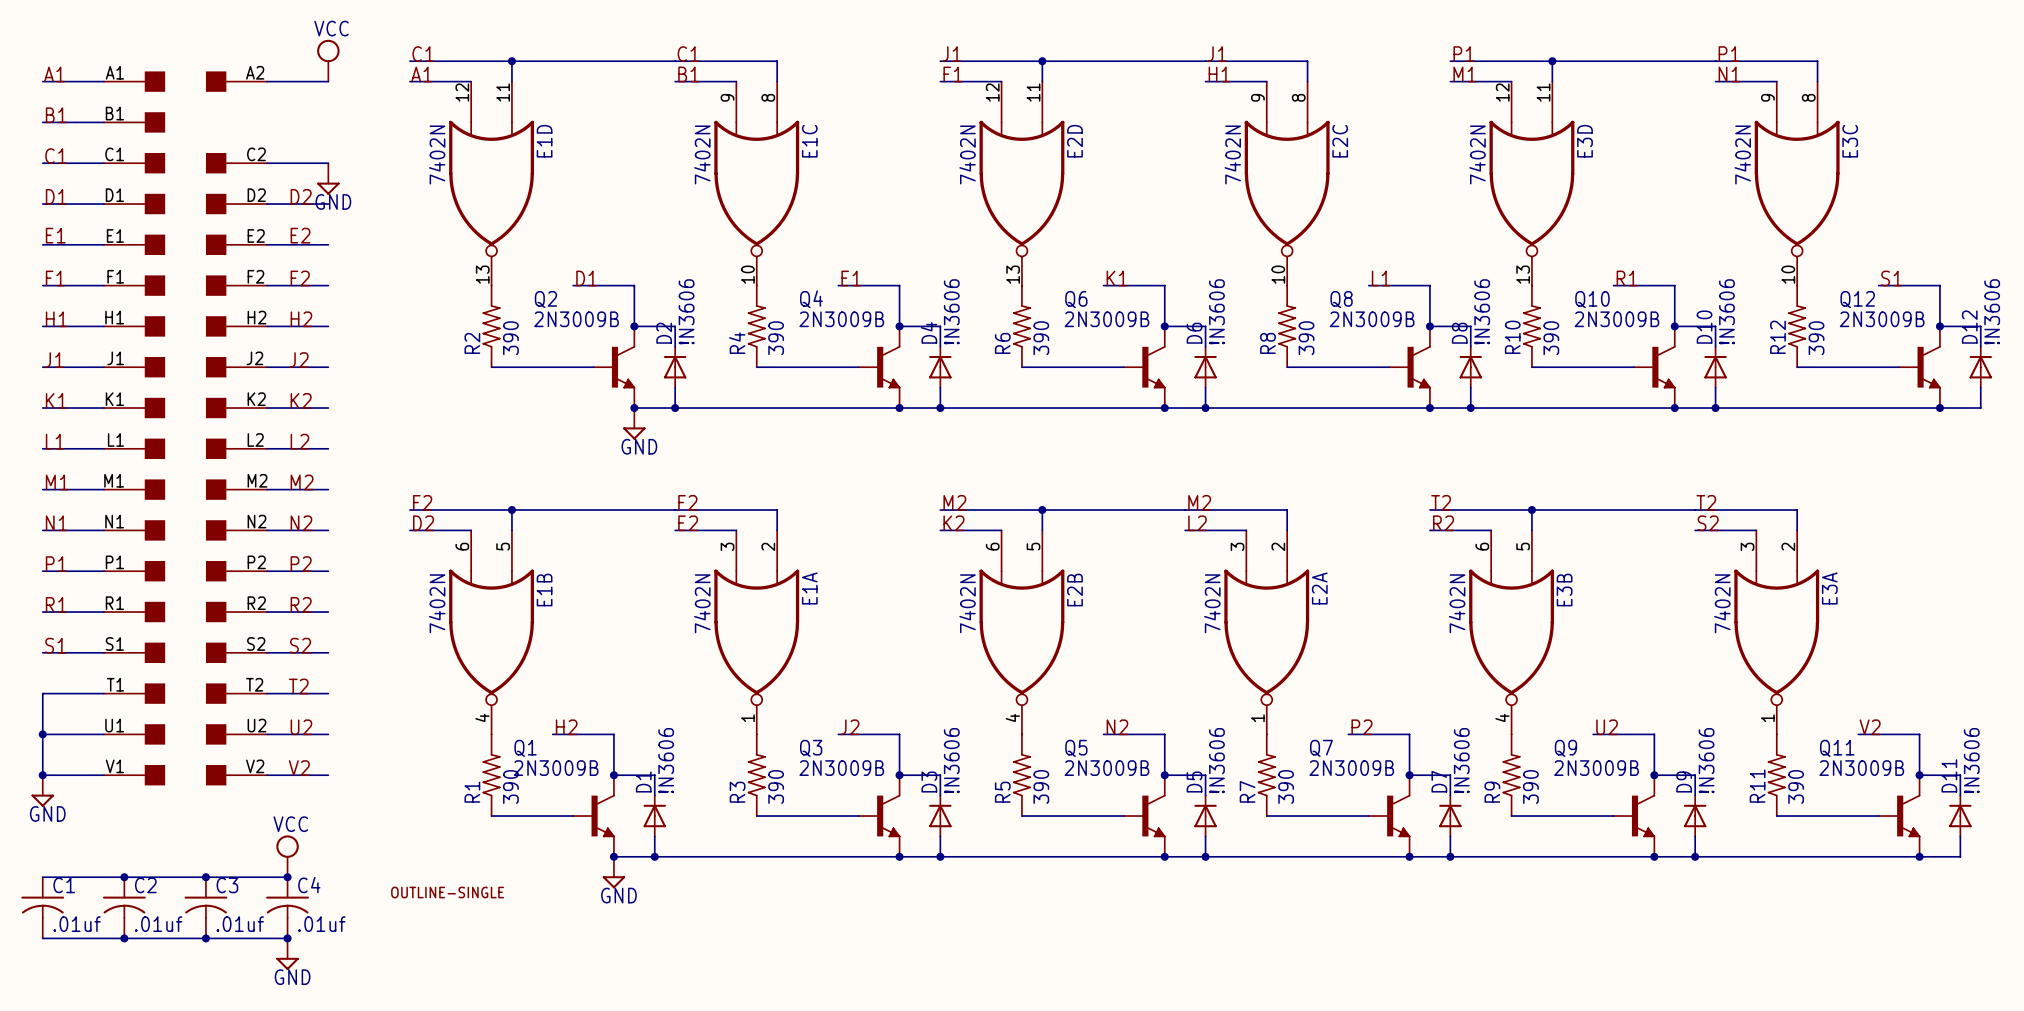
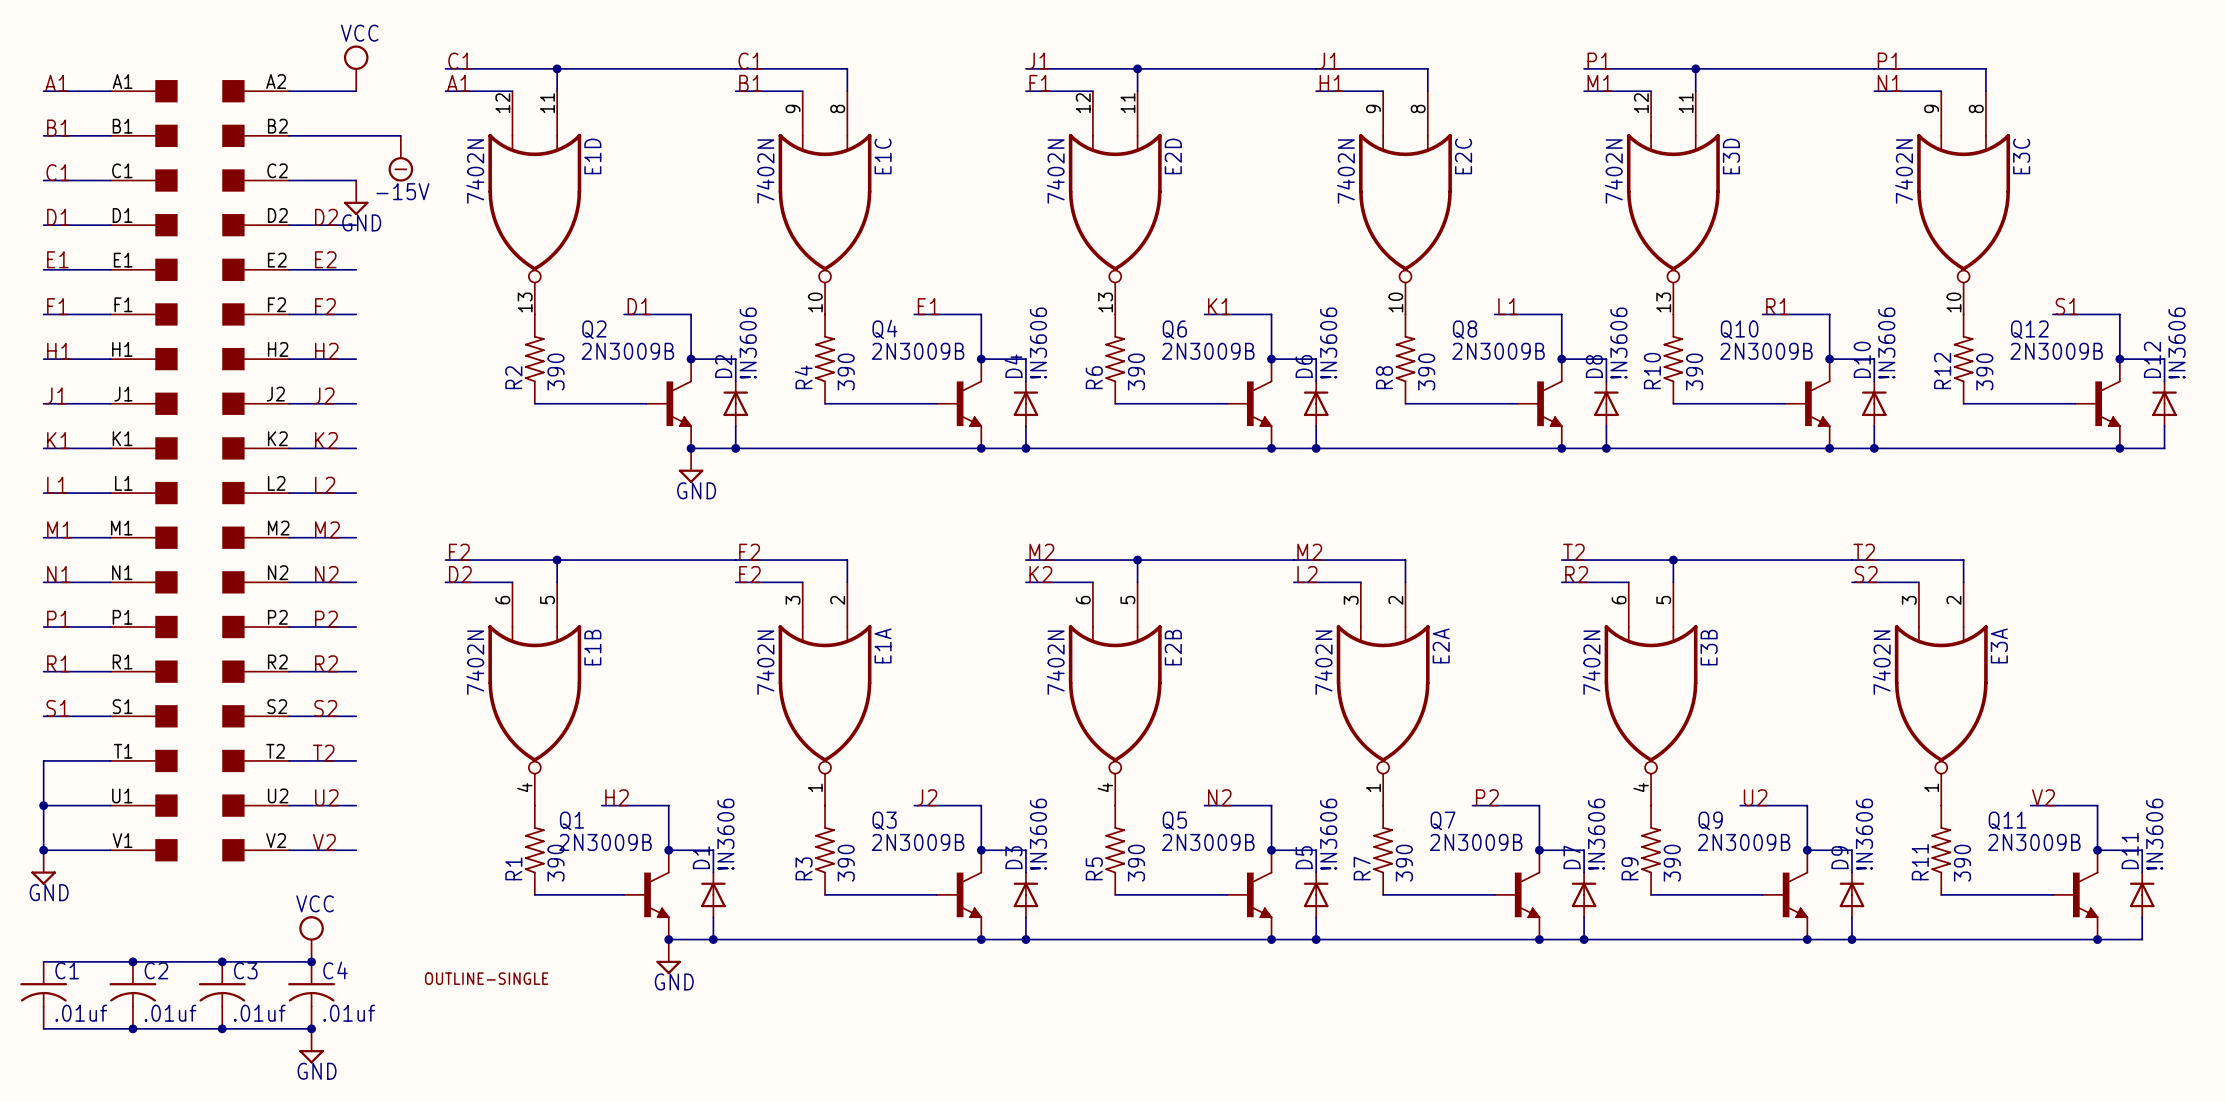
part: none -> (255, 135)
wire: none -> (289, 135) (400, 135)
power symbol: none -> -15V (400, 158)

